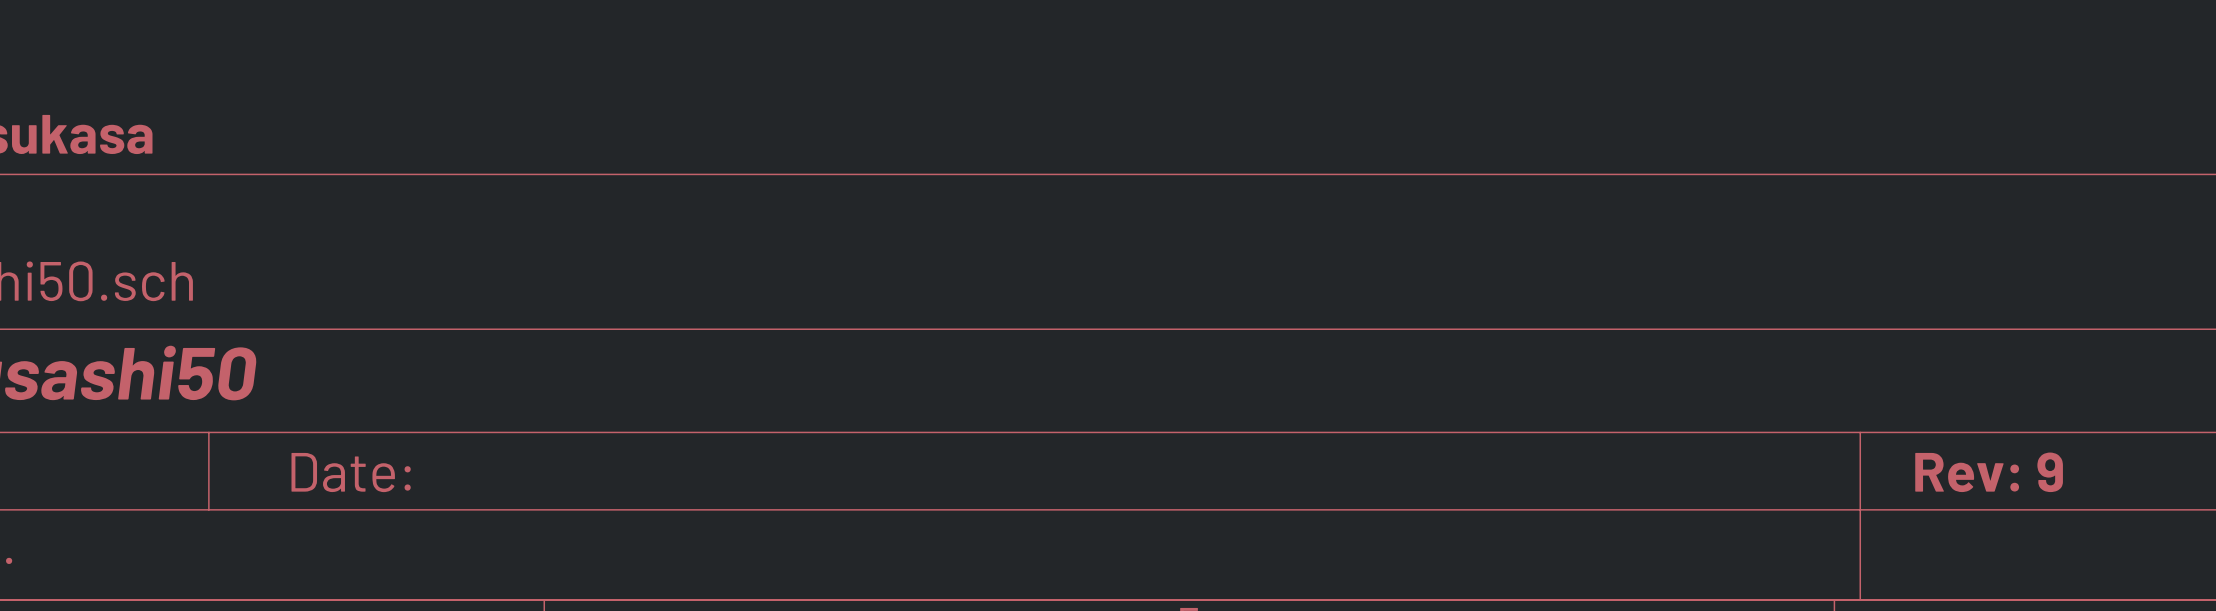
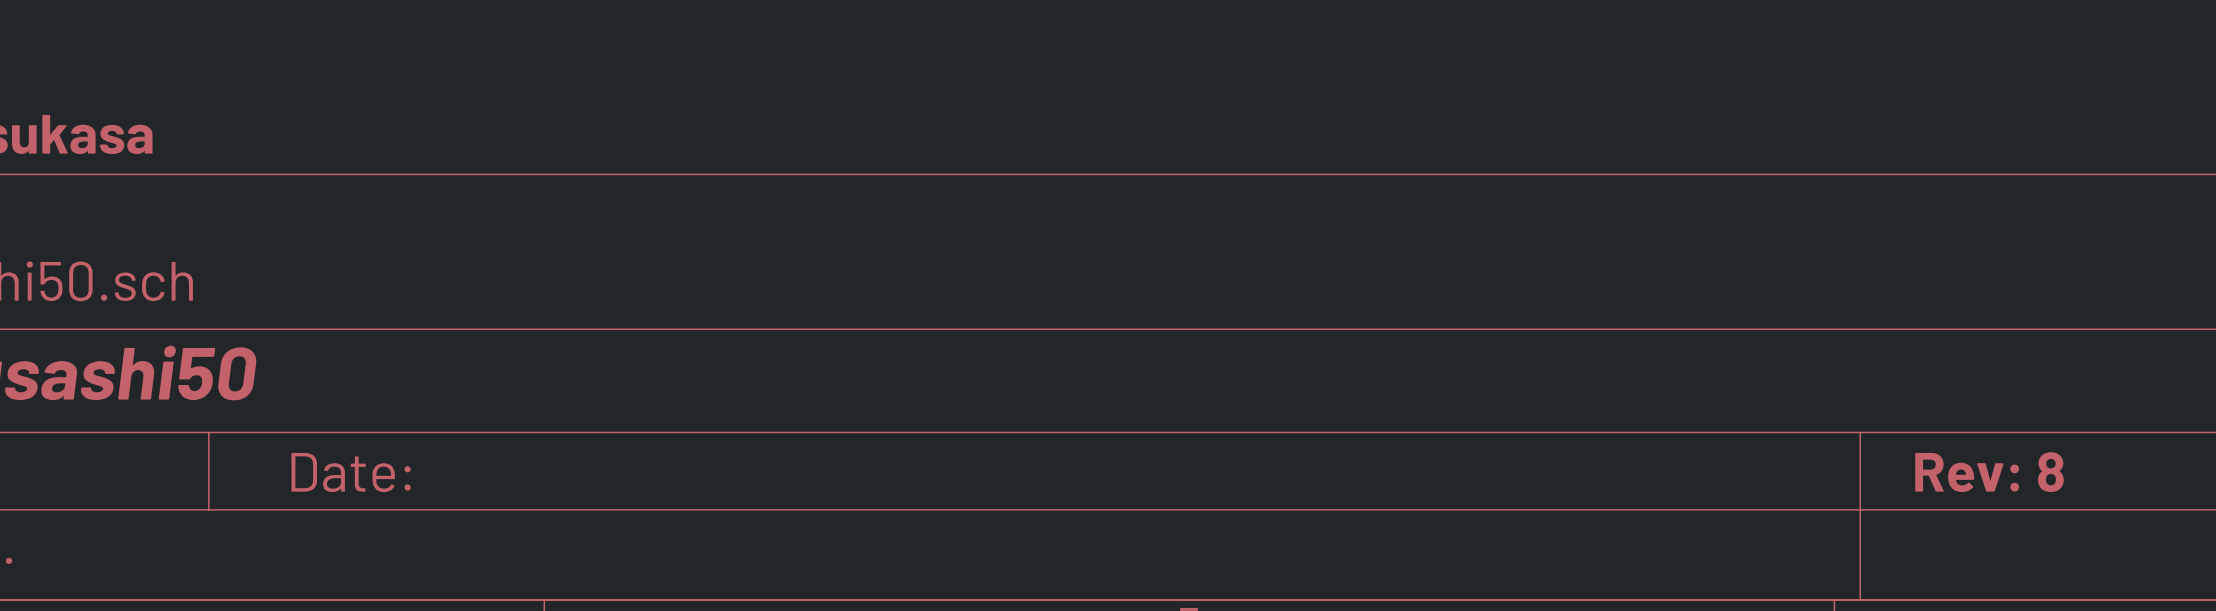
title block: Rev: 9 (1989, 472) -> Rev: 8 (1989, 472)

